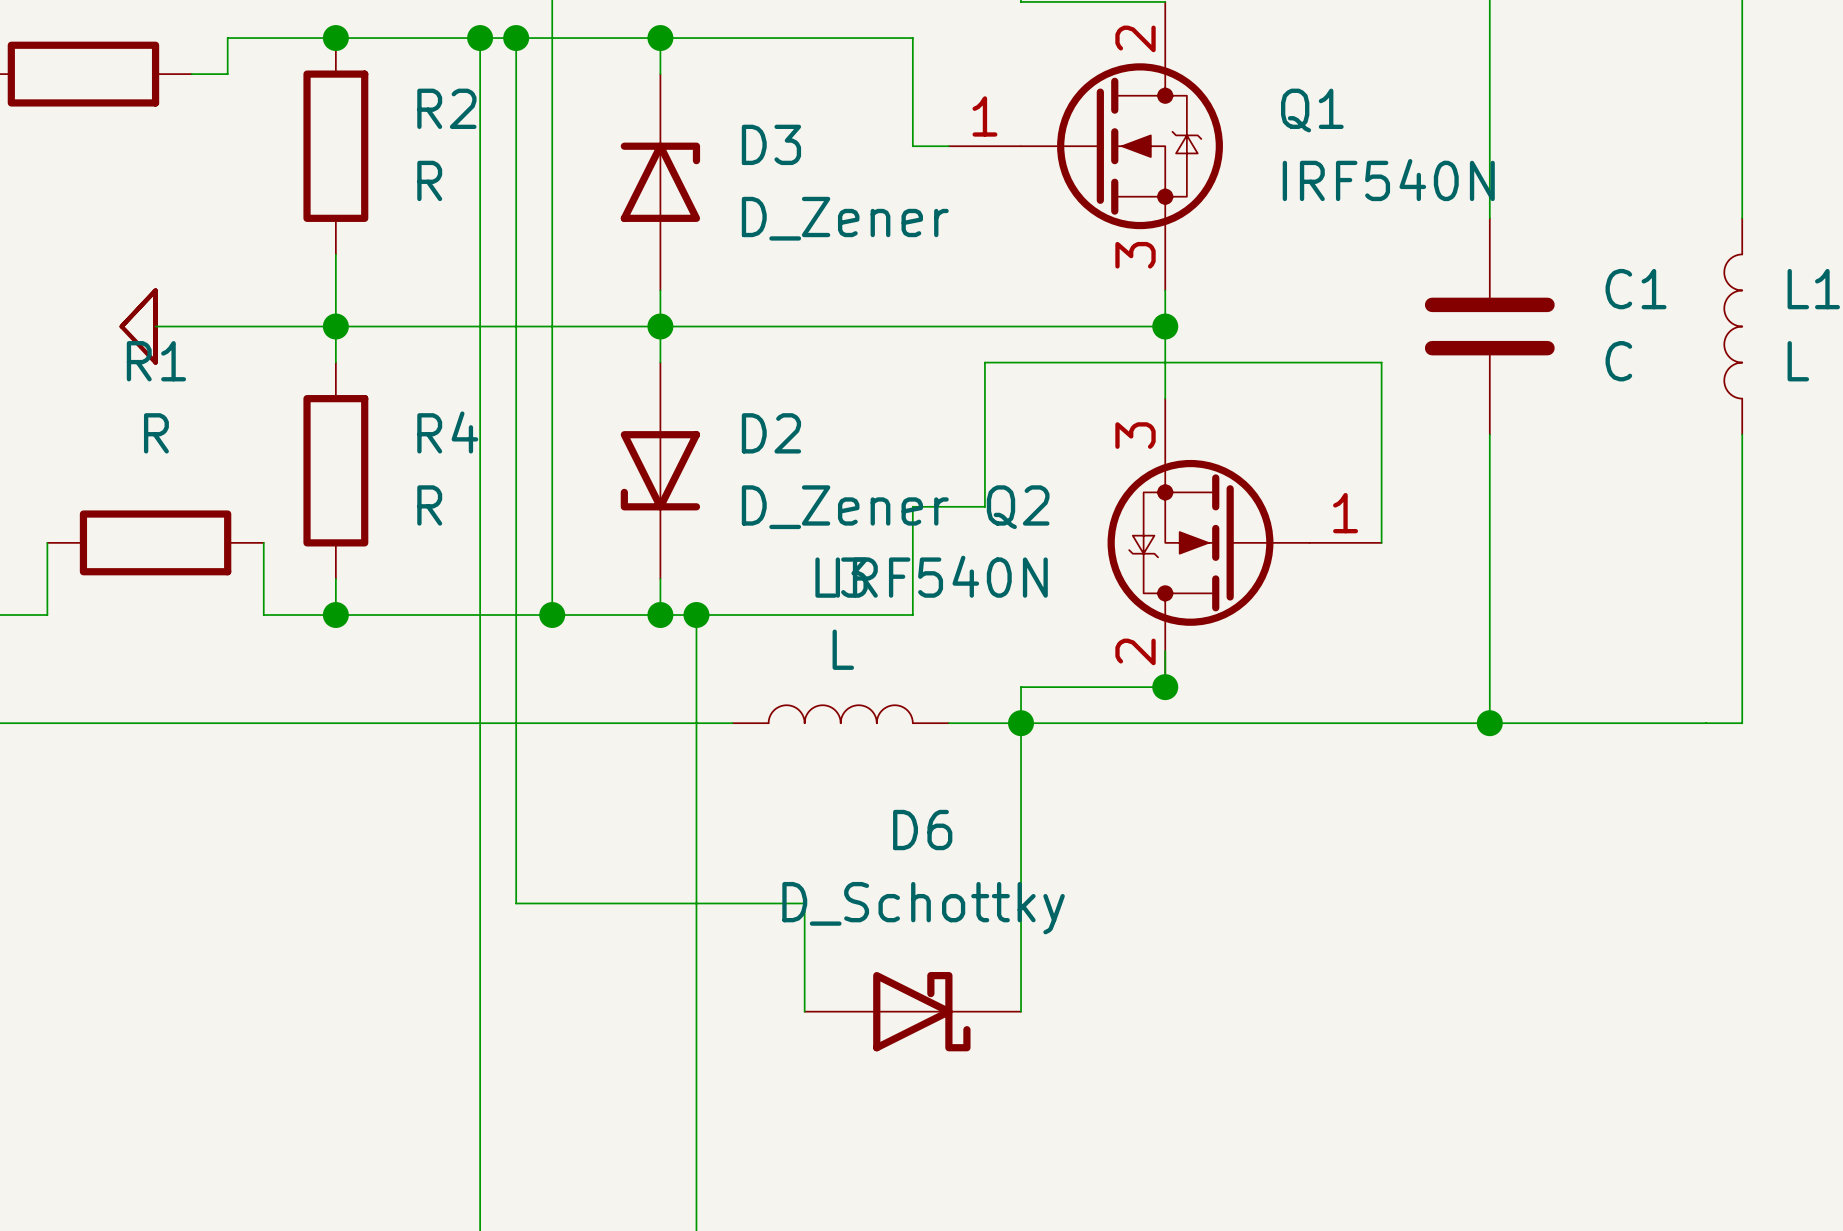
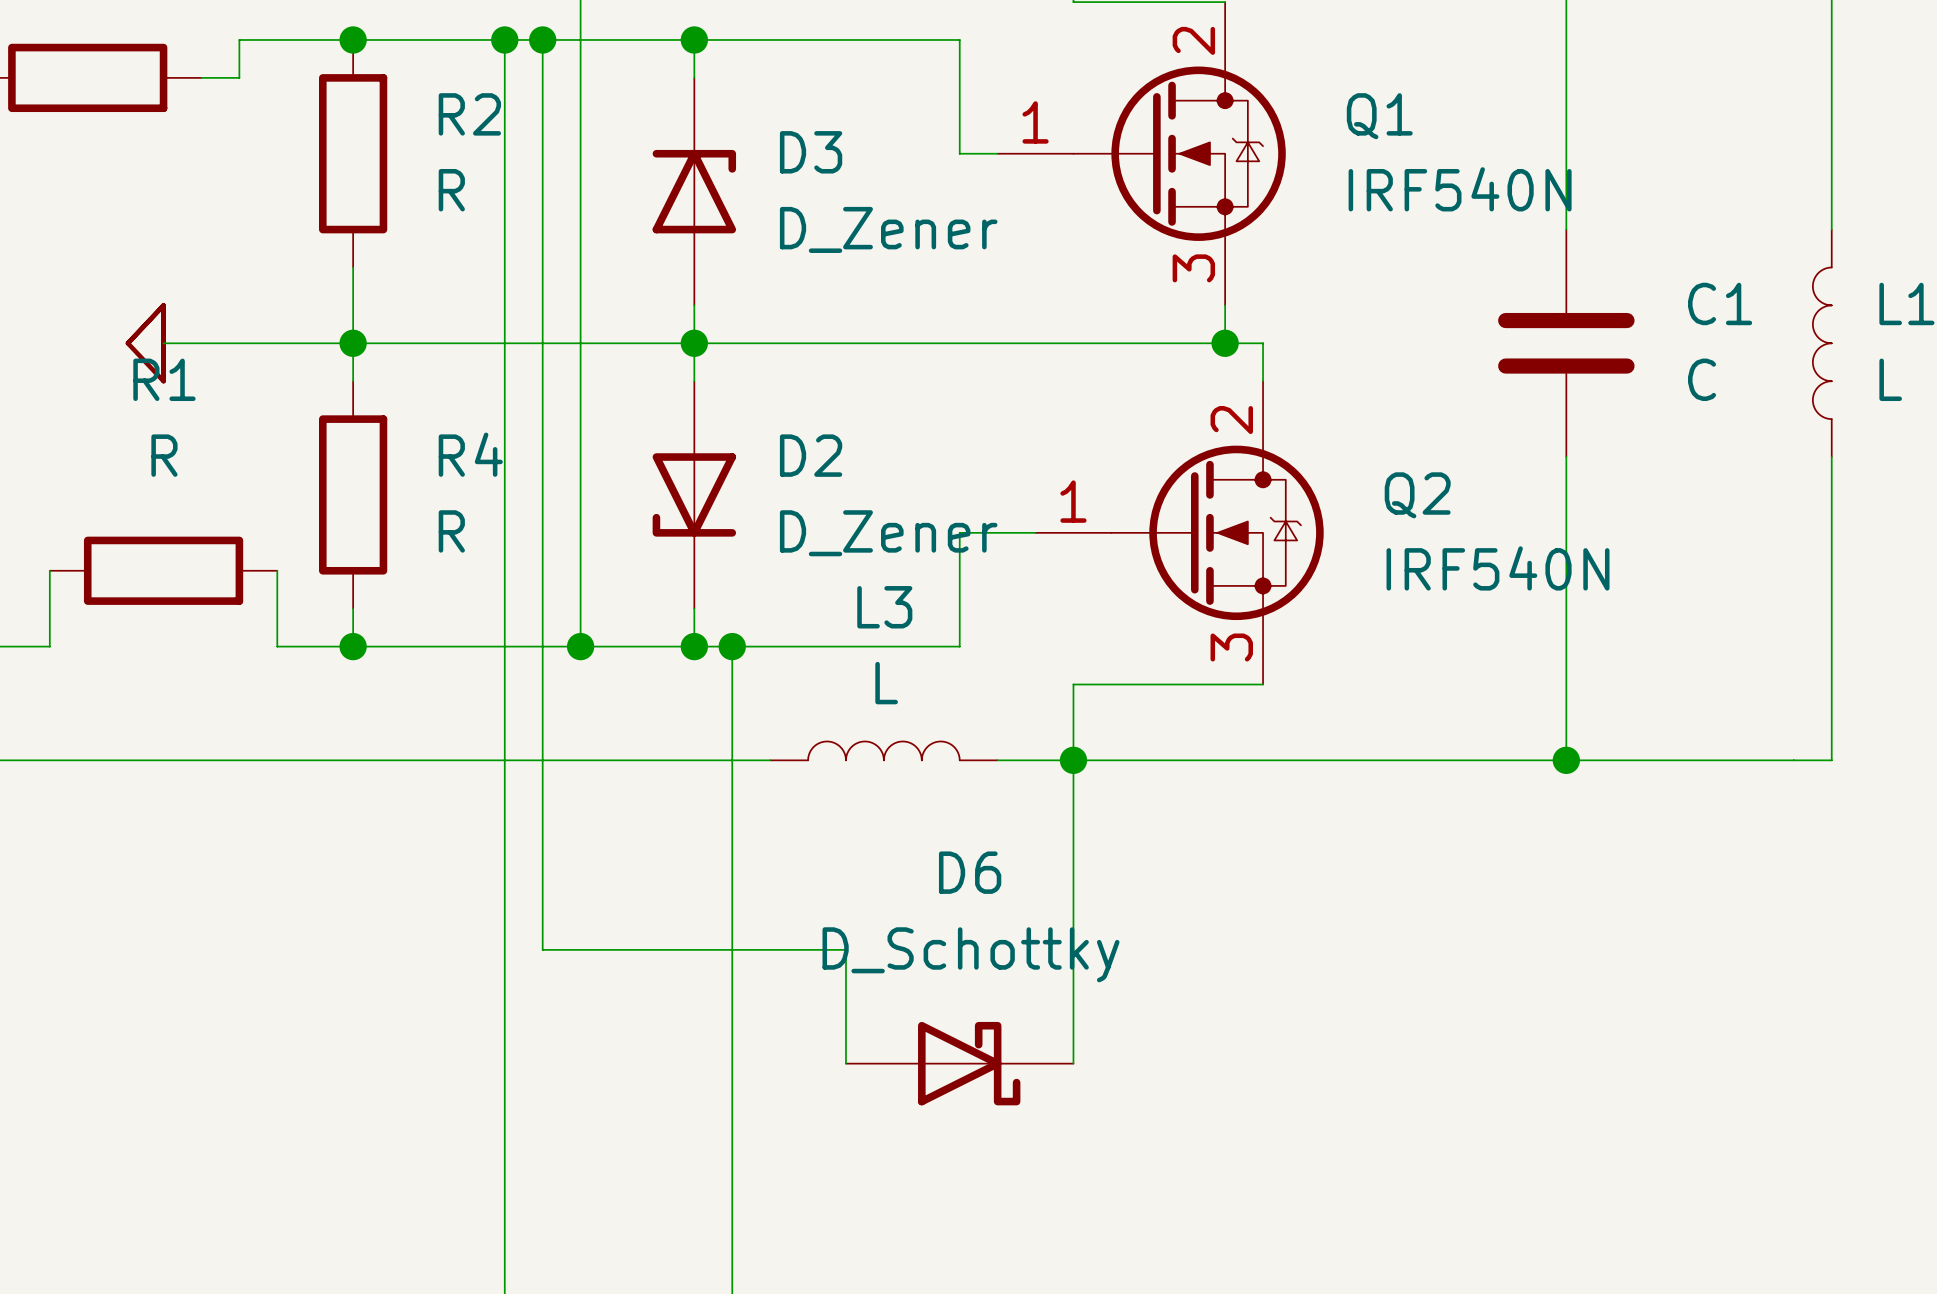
wire: (1165, 326) (1165, 398) -> (1225, 343) (1263, 343) (1263, 381)
wire: (984, 506) (984, 362) (1381, 362) (1381, 542) -> none
Q2 name position: Q2 (1018, 507) -> Q2 (1417, 495)
Q2 rotation: 0° (1208, 542) -> 180° (1217, 532)
Q2 value position: IRF540N (941, 576) -> IRF540N (1498, 568)
wire: (1165, 651) (1165, 687) (1021, 687) -> (1263, 684) (1073, 684) (1073, 722)
junction: (1165, 687) -> none

